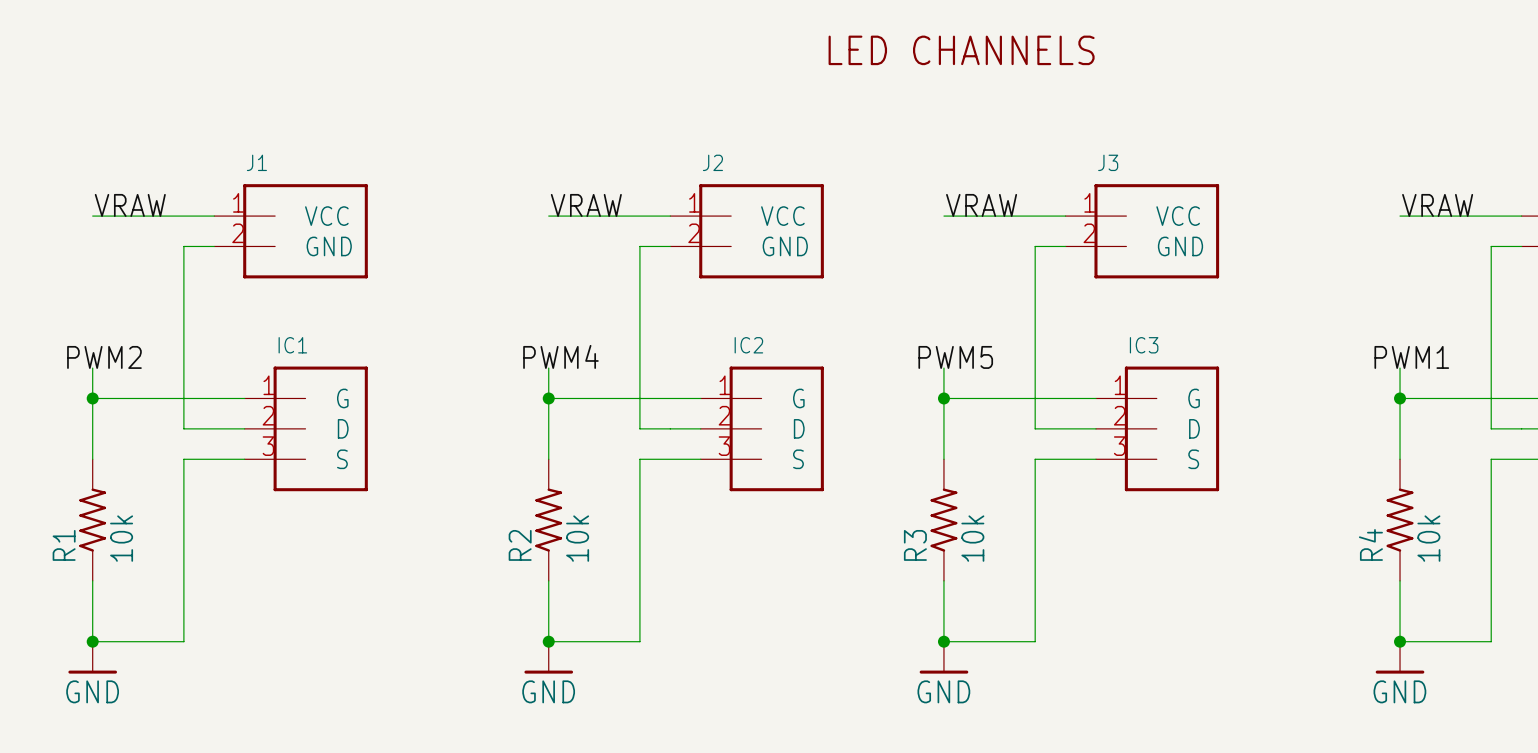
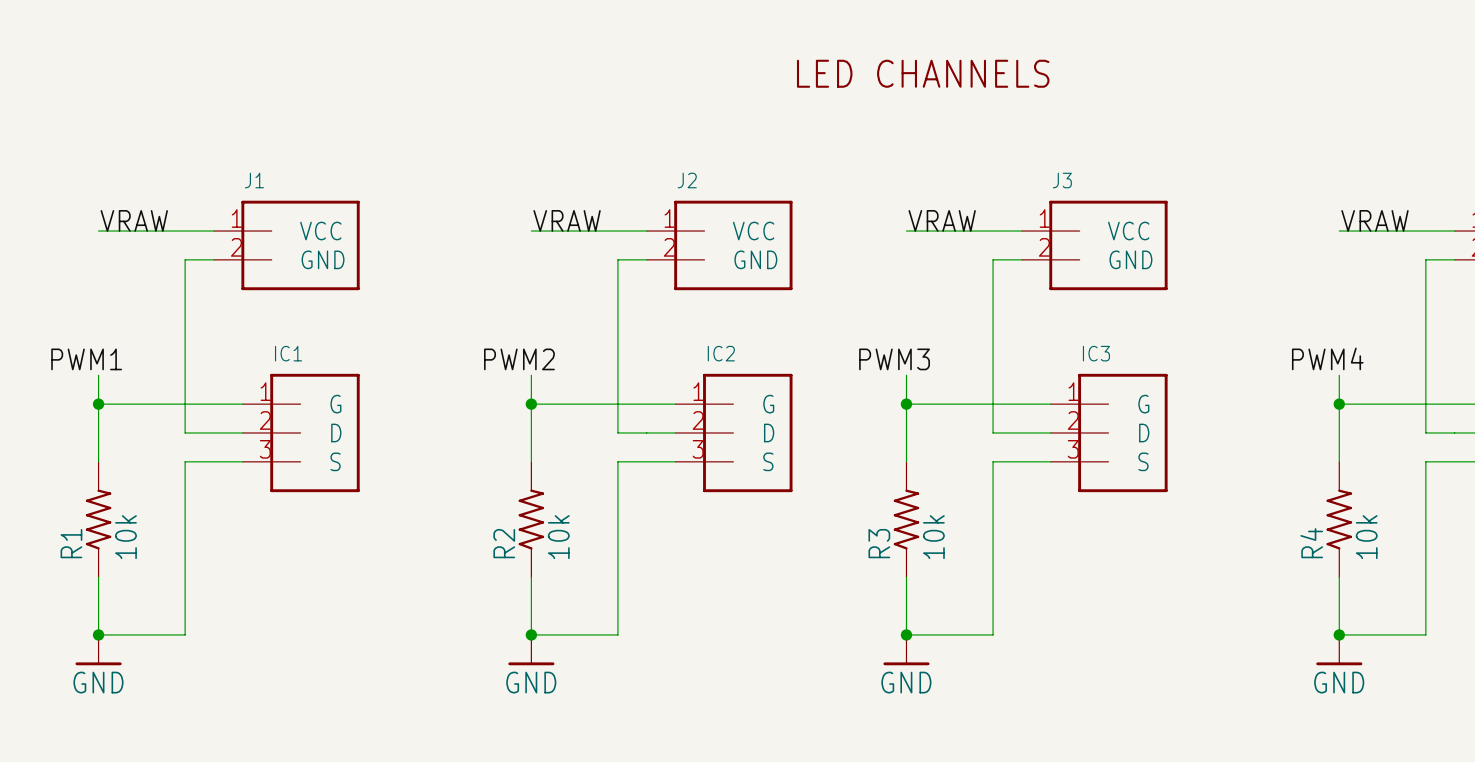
label: PWM4 (560, 356) -> PWM2 (519, 359)
label: PWM2 (104, 357) -> PWM1 (86, 359)
label: PWM5 (955, 357) -> PWM3 (894, 359)
label: PWM1 (1411, 357) -> PWM4 (1327, 358)

